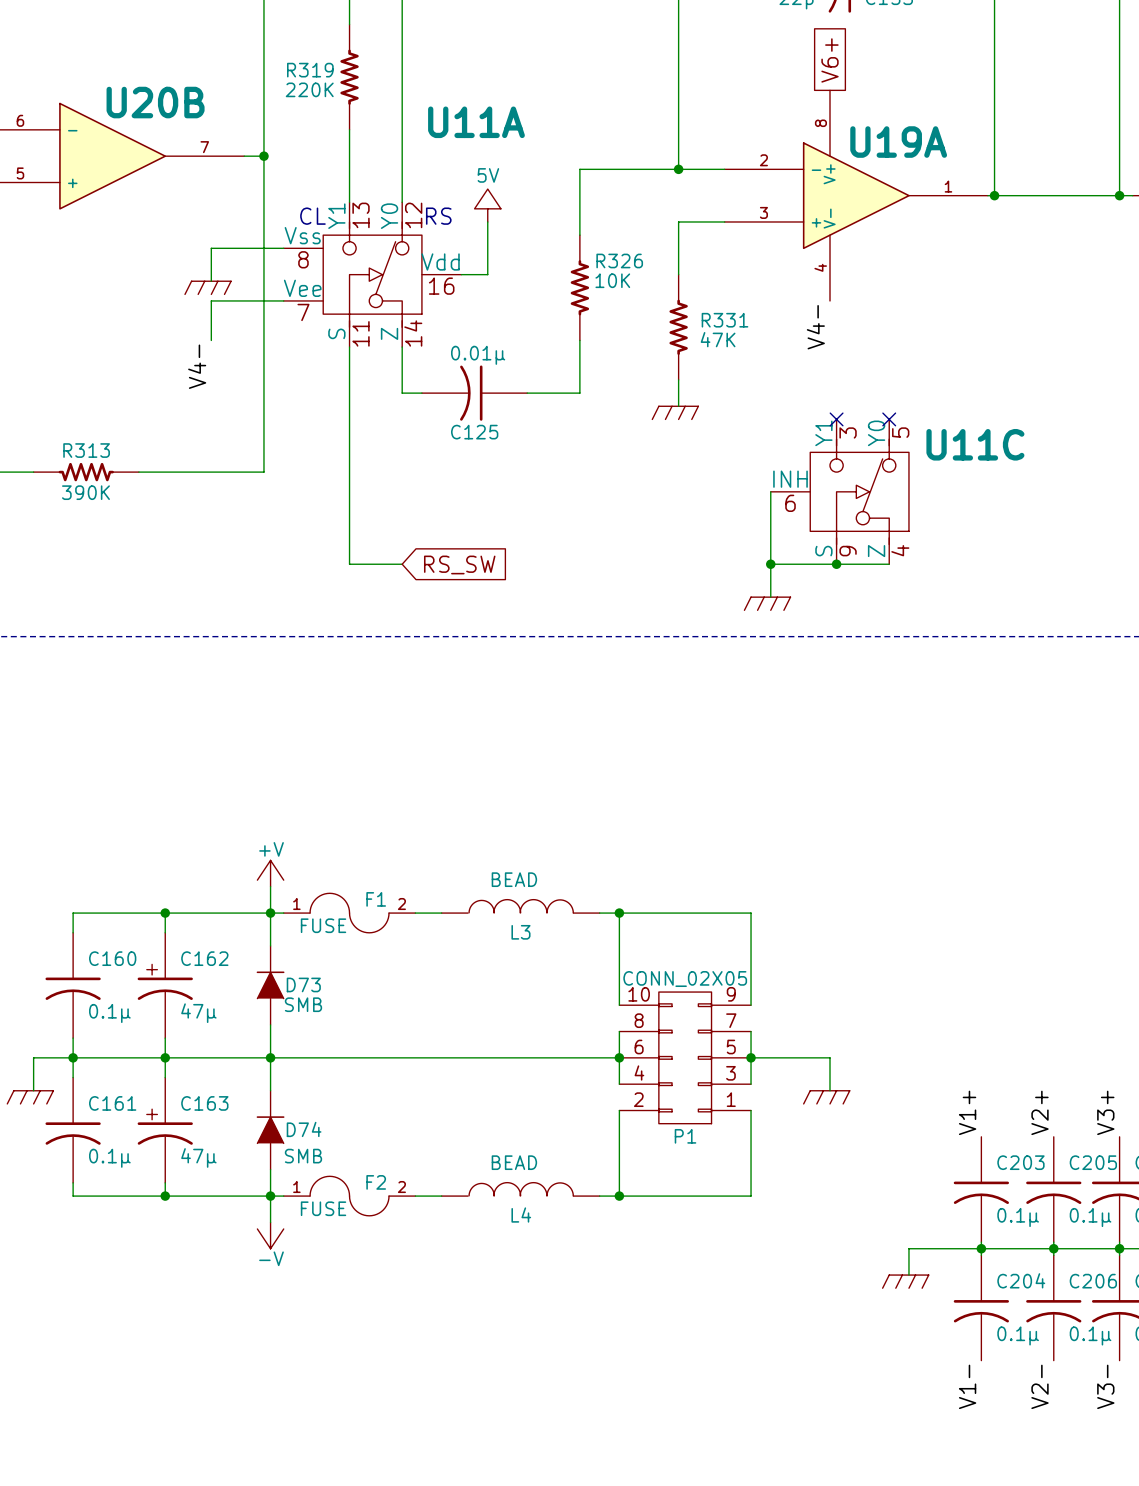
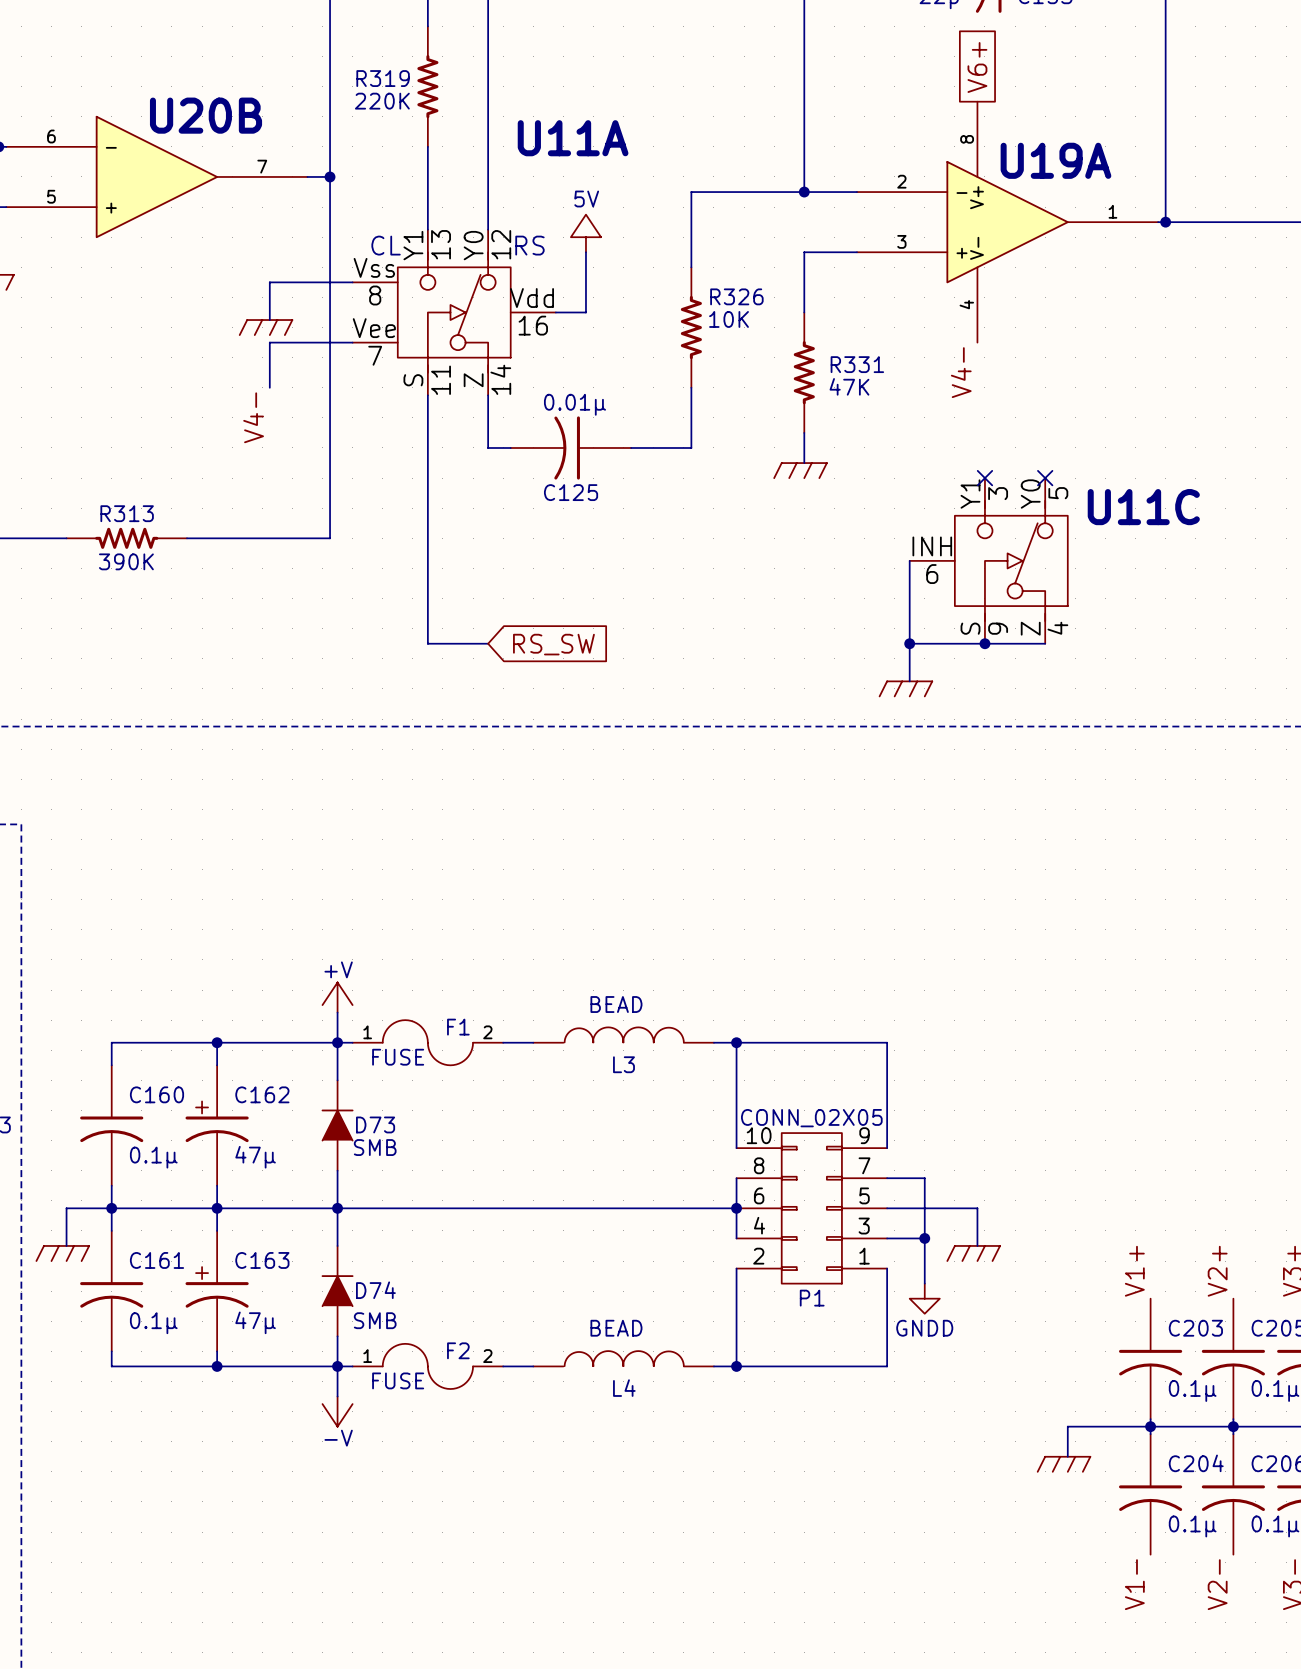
wire: (751, 1031) (751, 1084) -> (887, 1178) (924, 1178) (924, 1283)
junction position: (751, 1057) -> (924, 1238)
wire: none -> (887, 1238) (924, 1238)
power symbol: none -> GNDD (924, 1298)

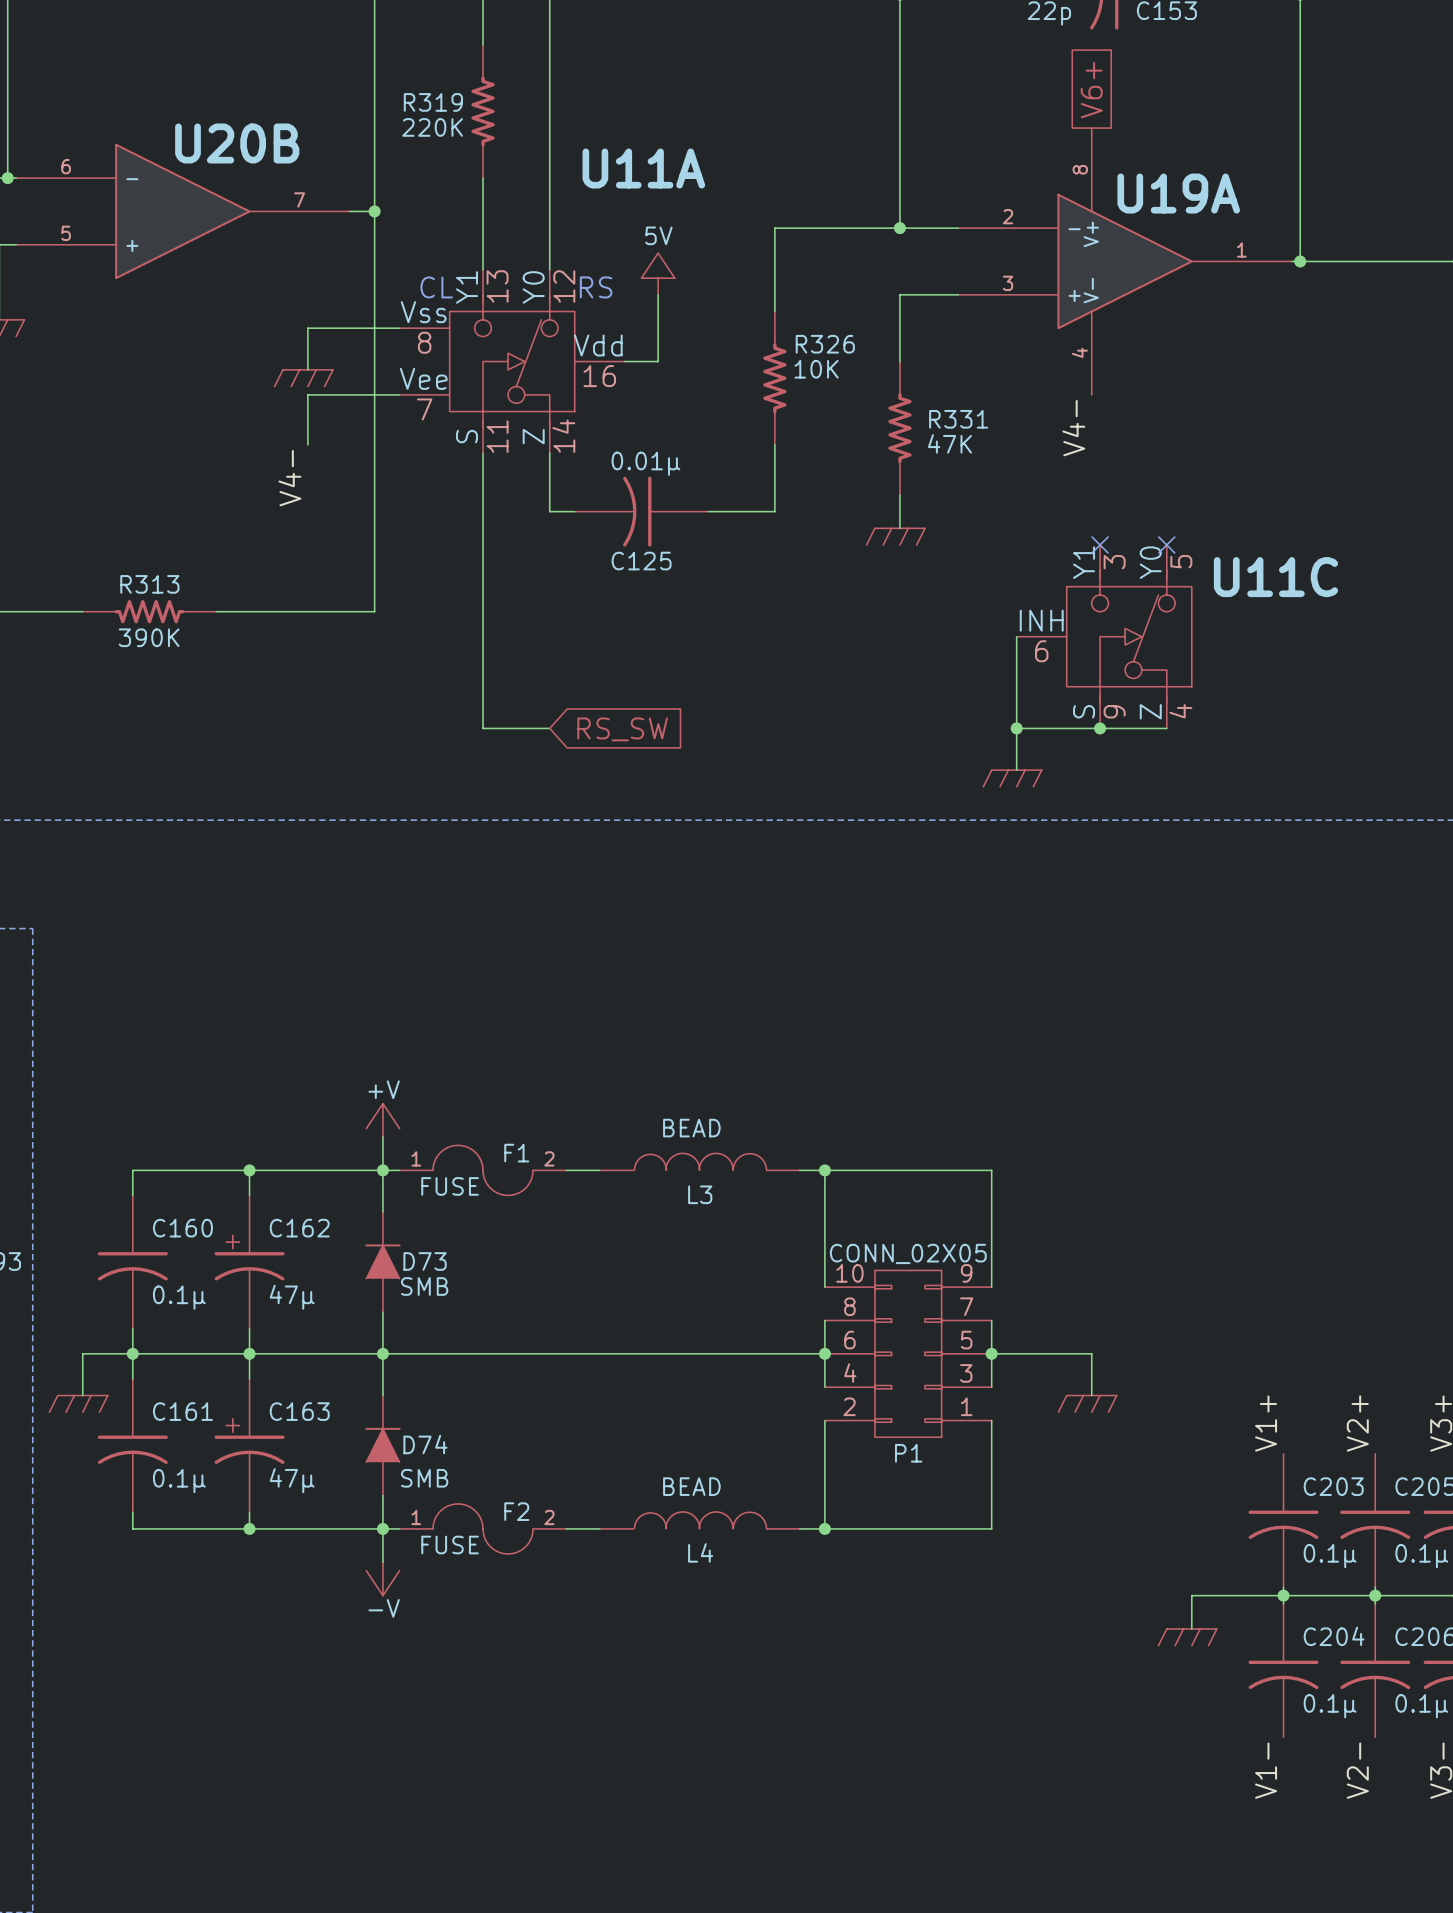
wire: (887, 1178) (924, 1178) (924, 1283) -> (991, 1320) (991, 1387)
wire: (887, 1238) (924, 1238) -> none
junction position: (924, 1238) -> (991, 1353)
power symbol: GNDD (924, 1298) -> none

